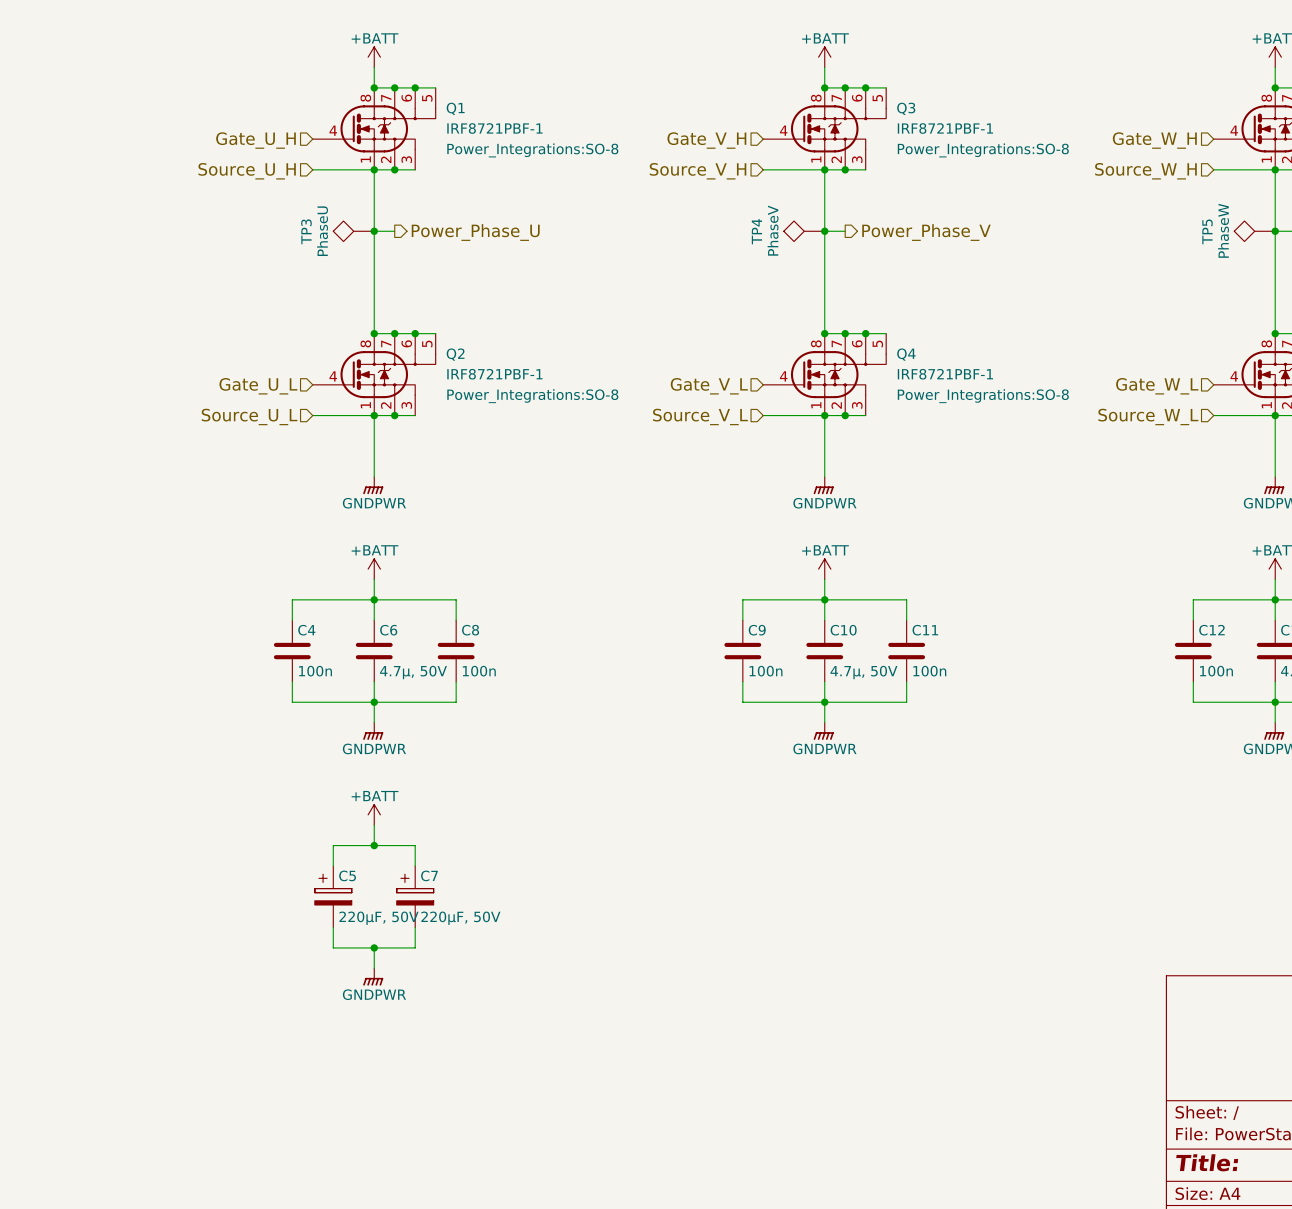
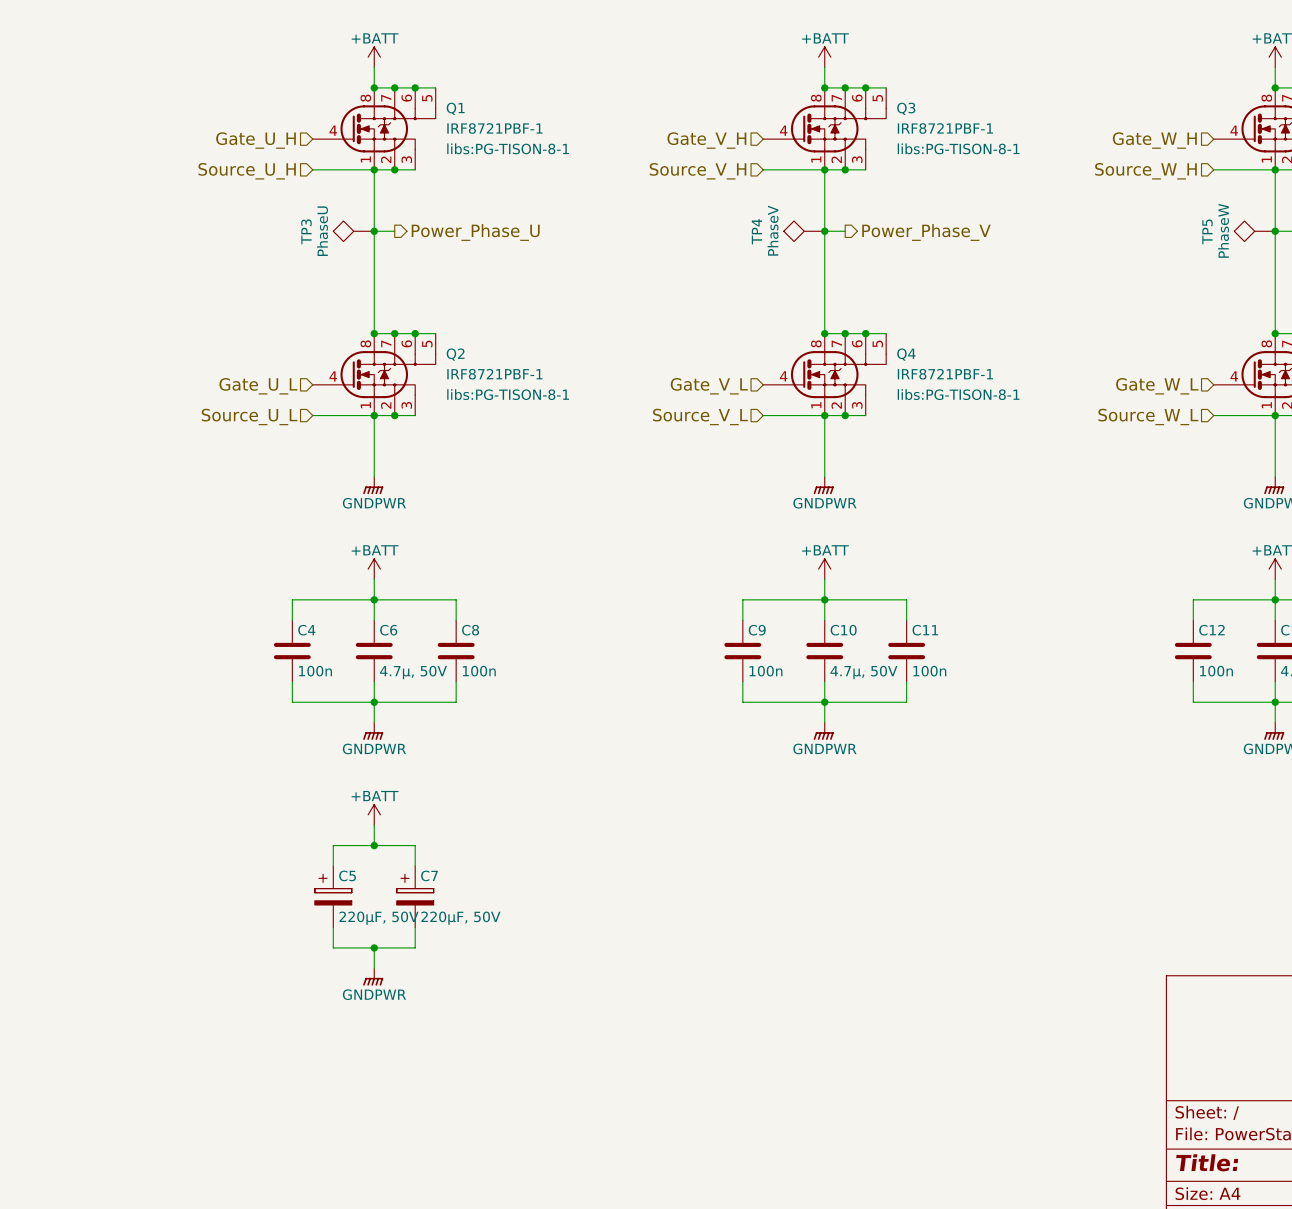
Q1 text: Power_Integrations:SO-8 (532, 150) -> libs:PG-TISON-8-1 (508, 148)
Q3 text: Power_Integrations:SO-8 (983, 150) -> libs:PG-TISON-8-1 (958, 148)
Q2 text: Power_Integrations:SO-8 (532, 396) -> libs:PG-TISON-8-1 (508, 394)
Q4 text: Power_Integrations:SO-8 (983, 396) -> libs:PG-TISON-8-1 (958, 394)

